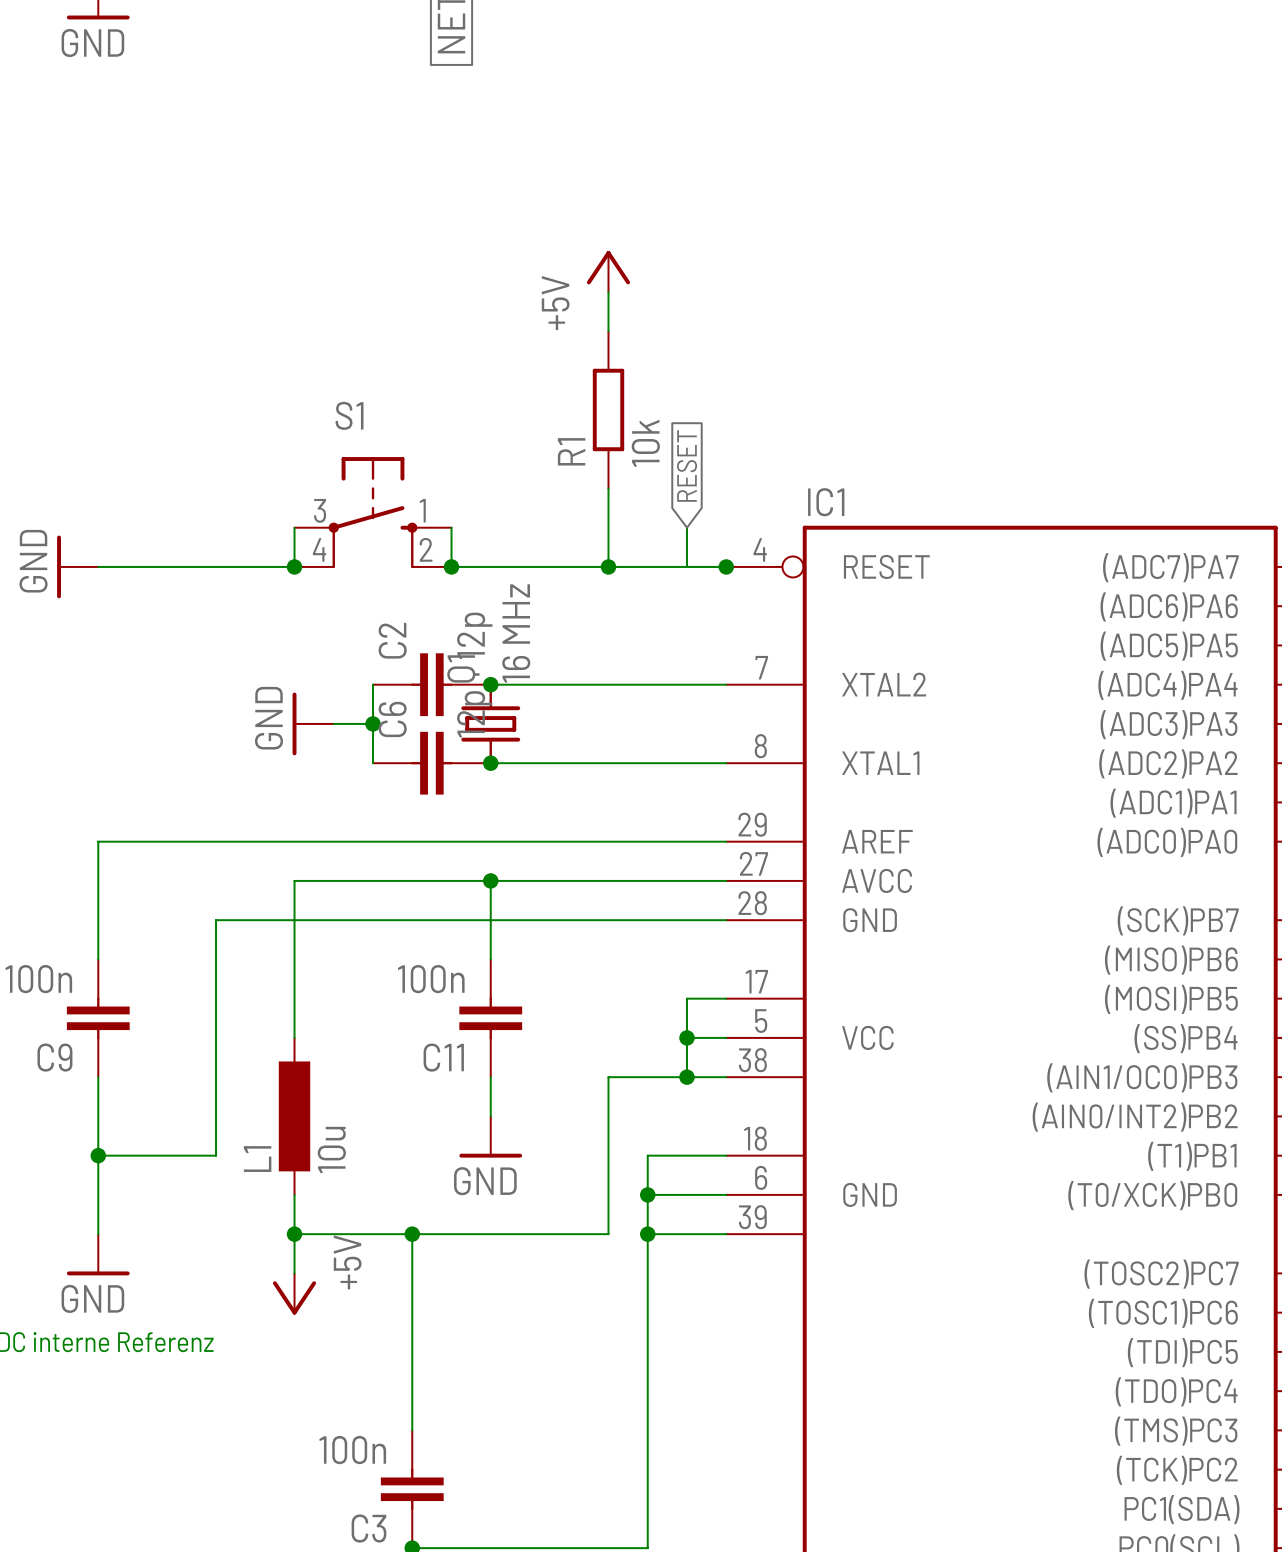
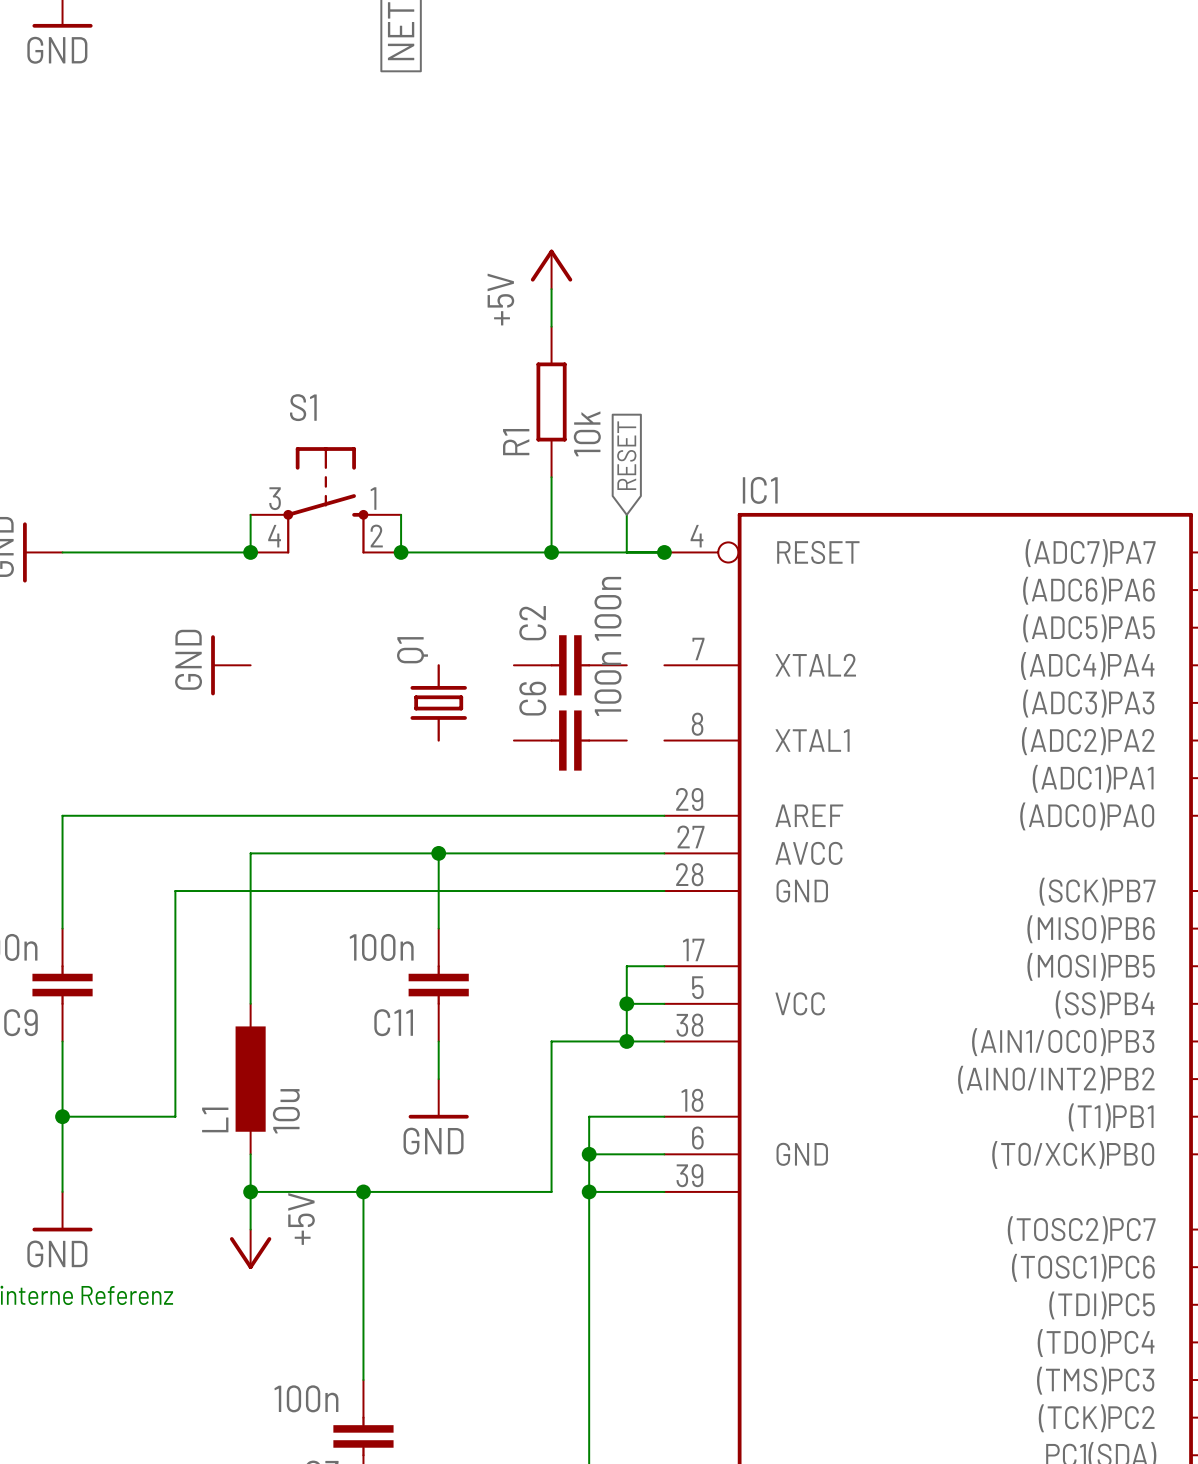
Q1 value: 16 MHz (516, 633) -> none
C2 value: 12p (474, 635) -> 100n (607, 608)
wire: (373, 684) (373, 763) -> none
C2 position: (431, 684) -> (570, 665)
wire: (490, 684) (726, 684) -> none
junction: (490, 684) -> none
C6 value: 12p (474, 714) -> 100n (607, 684)
power symbol position: GND (313, 723) -> GND (230, 665)
wire: (333, 723) (373, 723) -> none
junction: (373, 723) -> none
C6 position: (431, 763) -> (570, 740)
wire: (490, 763) (726, 763) -> none
junction: (490, 763) -> none

